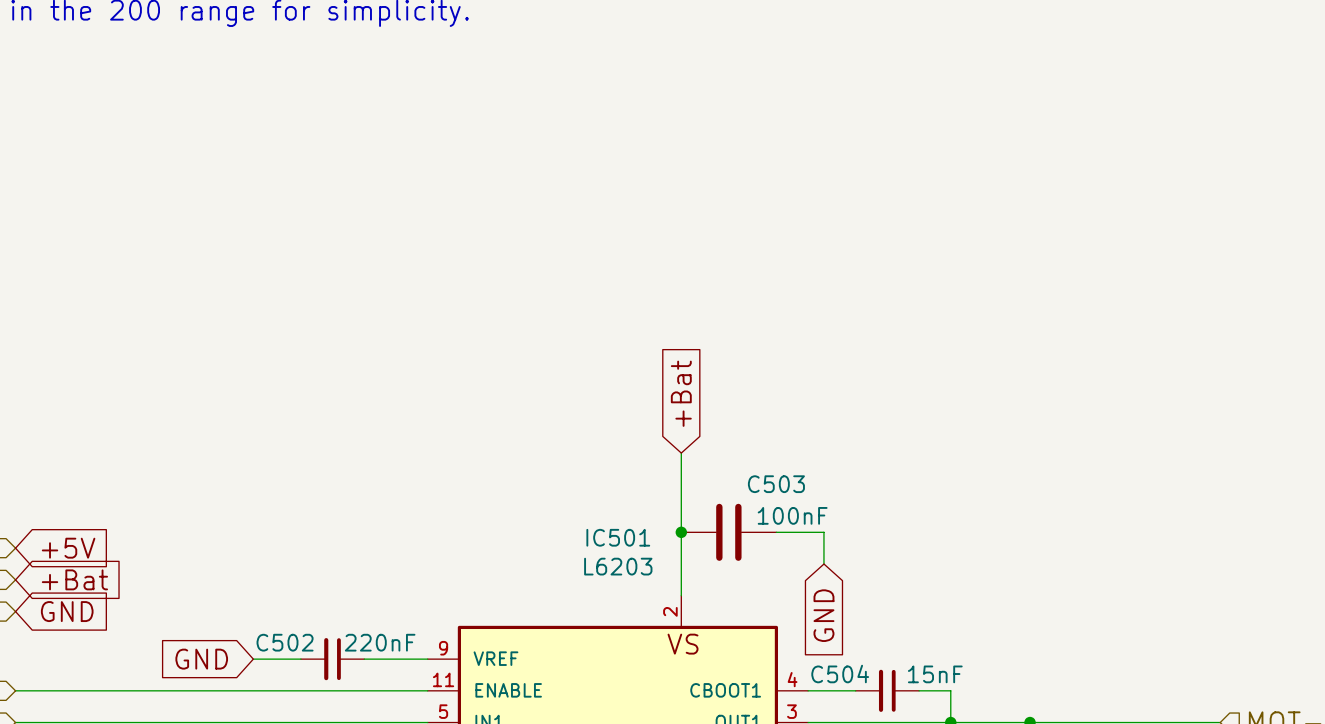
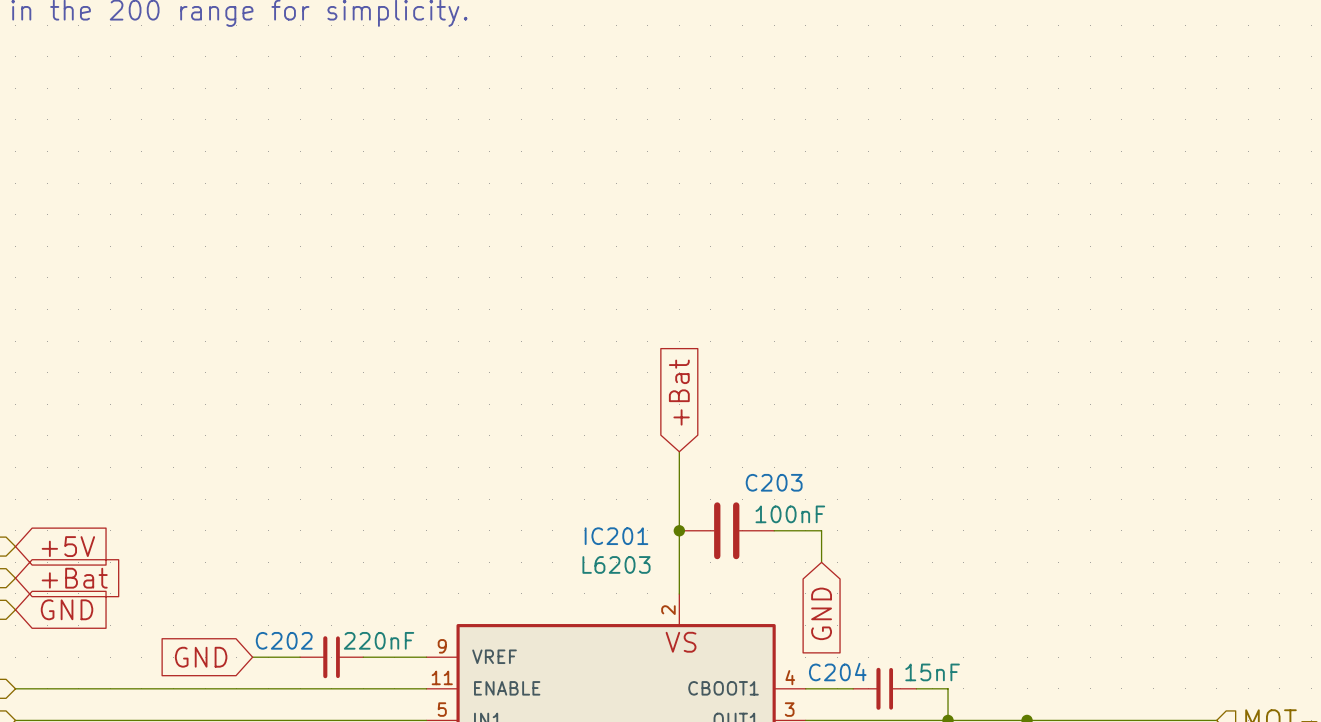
C503 name: C503 (776, 484) -> C203 (774, 482)
IC501 name: IC501 (618, 537) -> IC201 (616, 536)
C502 name: C502 (285, 642) -> C202 (284, 640)
C504 name: C504 (840, 674) -> C204 (837, 672)

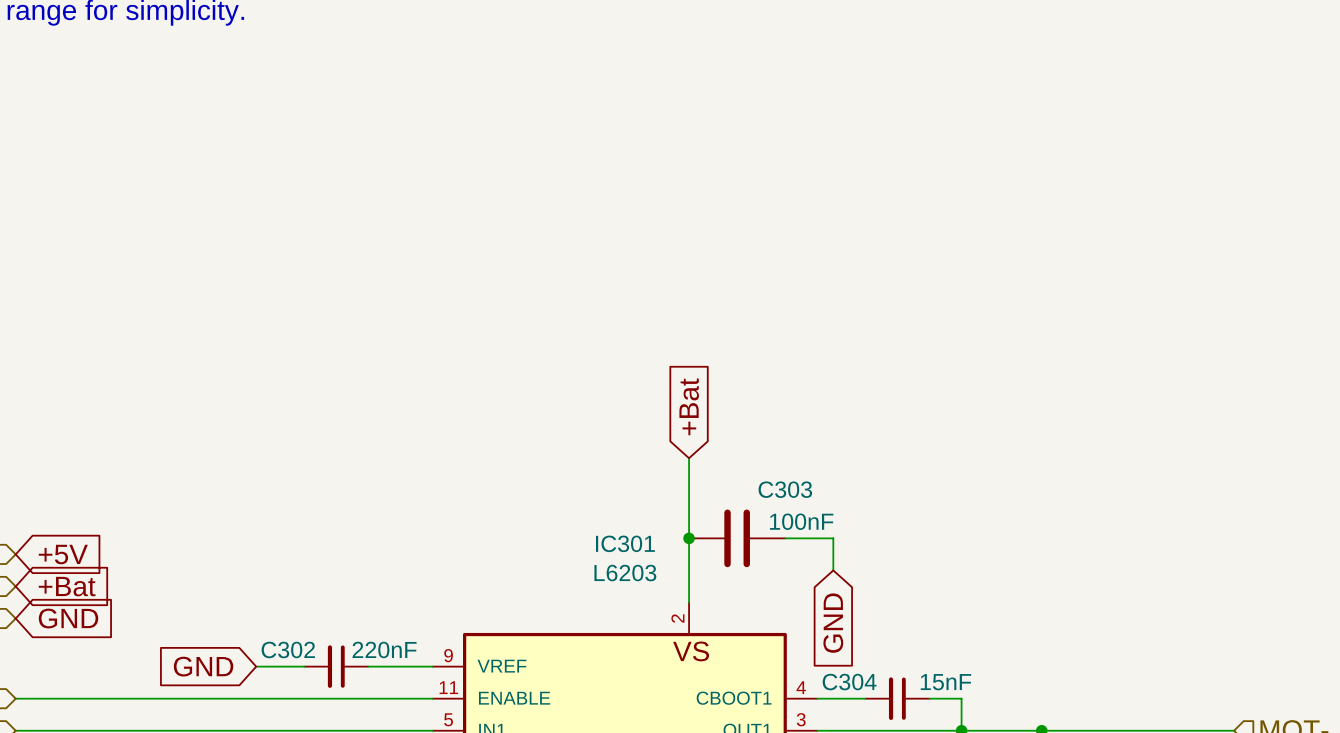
C203 name: C203 (774, 482) -> C303 (785, 489)
IC201 name: IC201 (616, 536) -> IC301 (625, 543)
C202 name: C202 (284, 640) -> C302 (288, 649)
C204 name: C204 (837, 672) -> C304 (849, 682)

